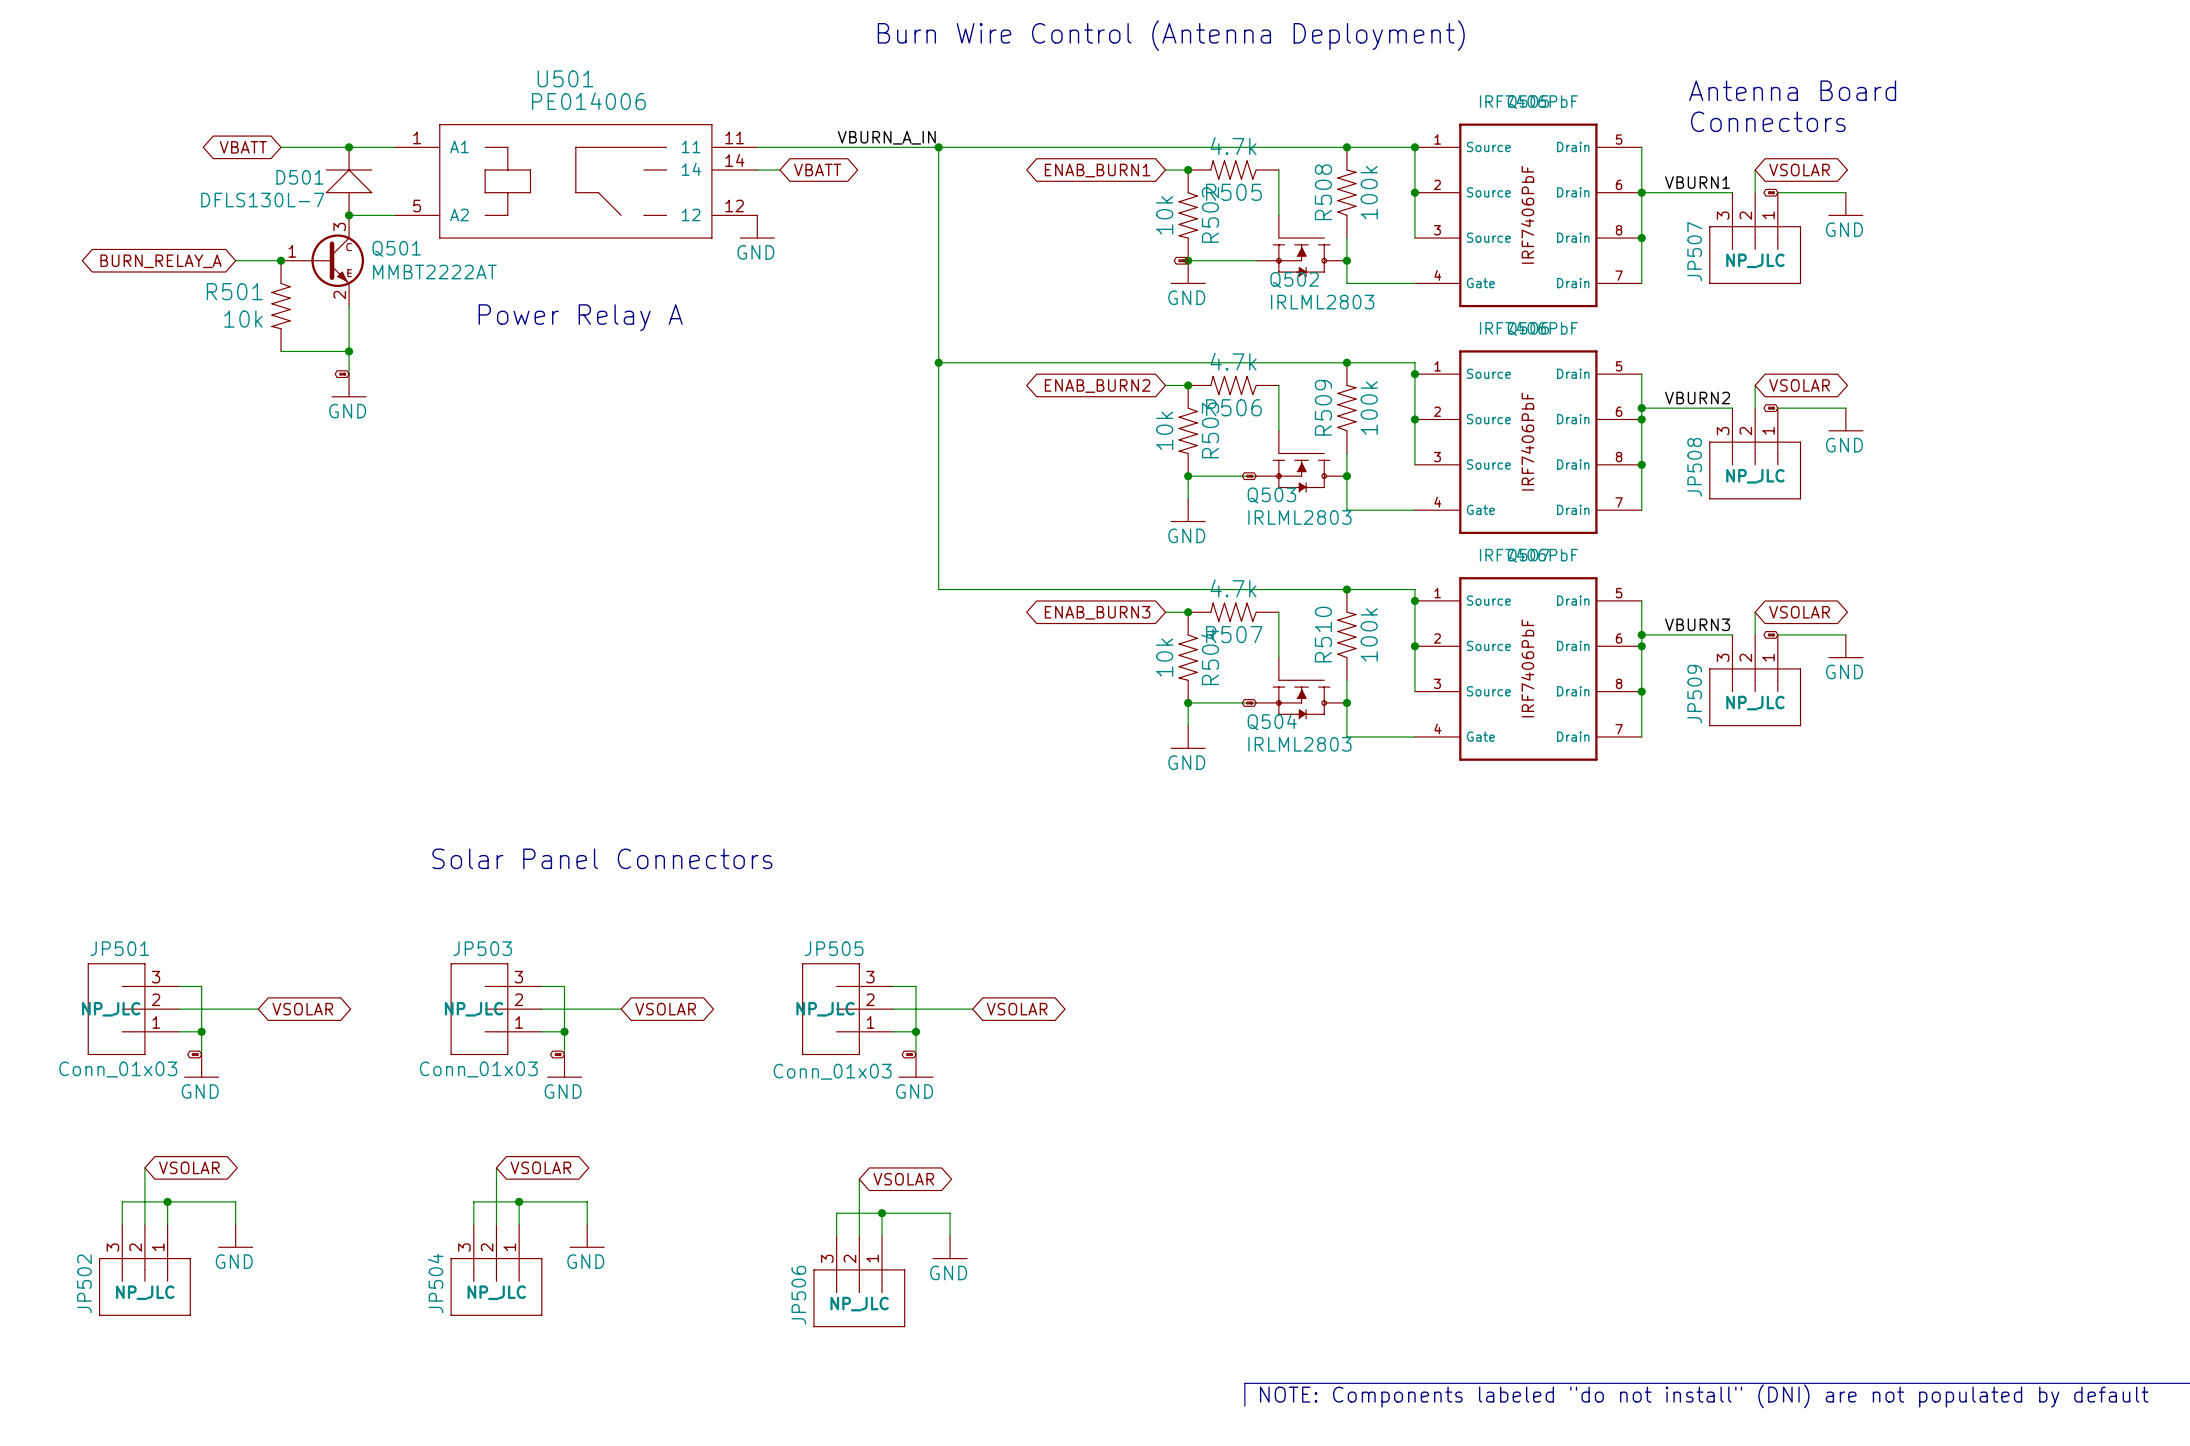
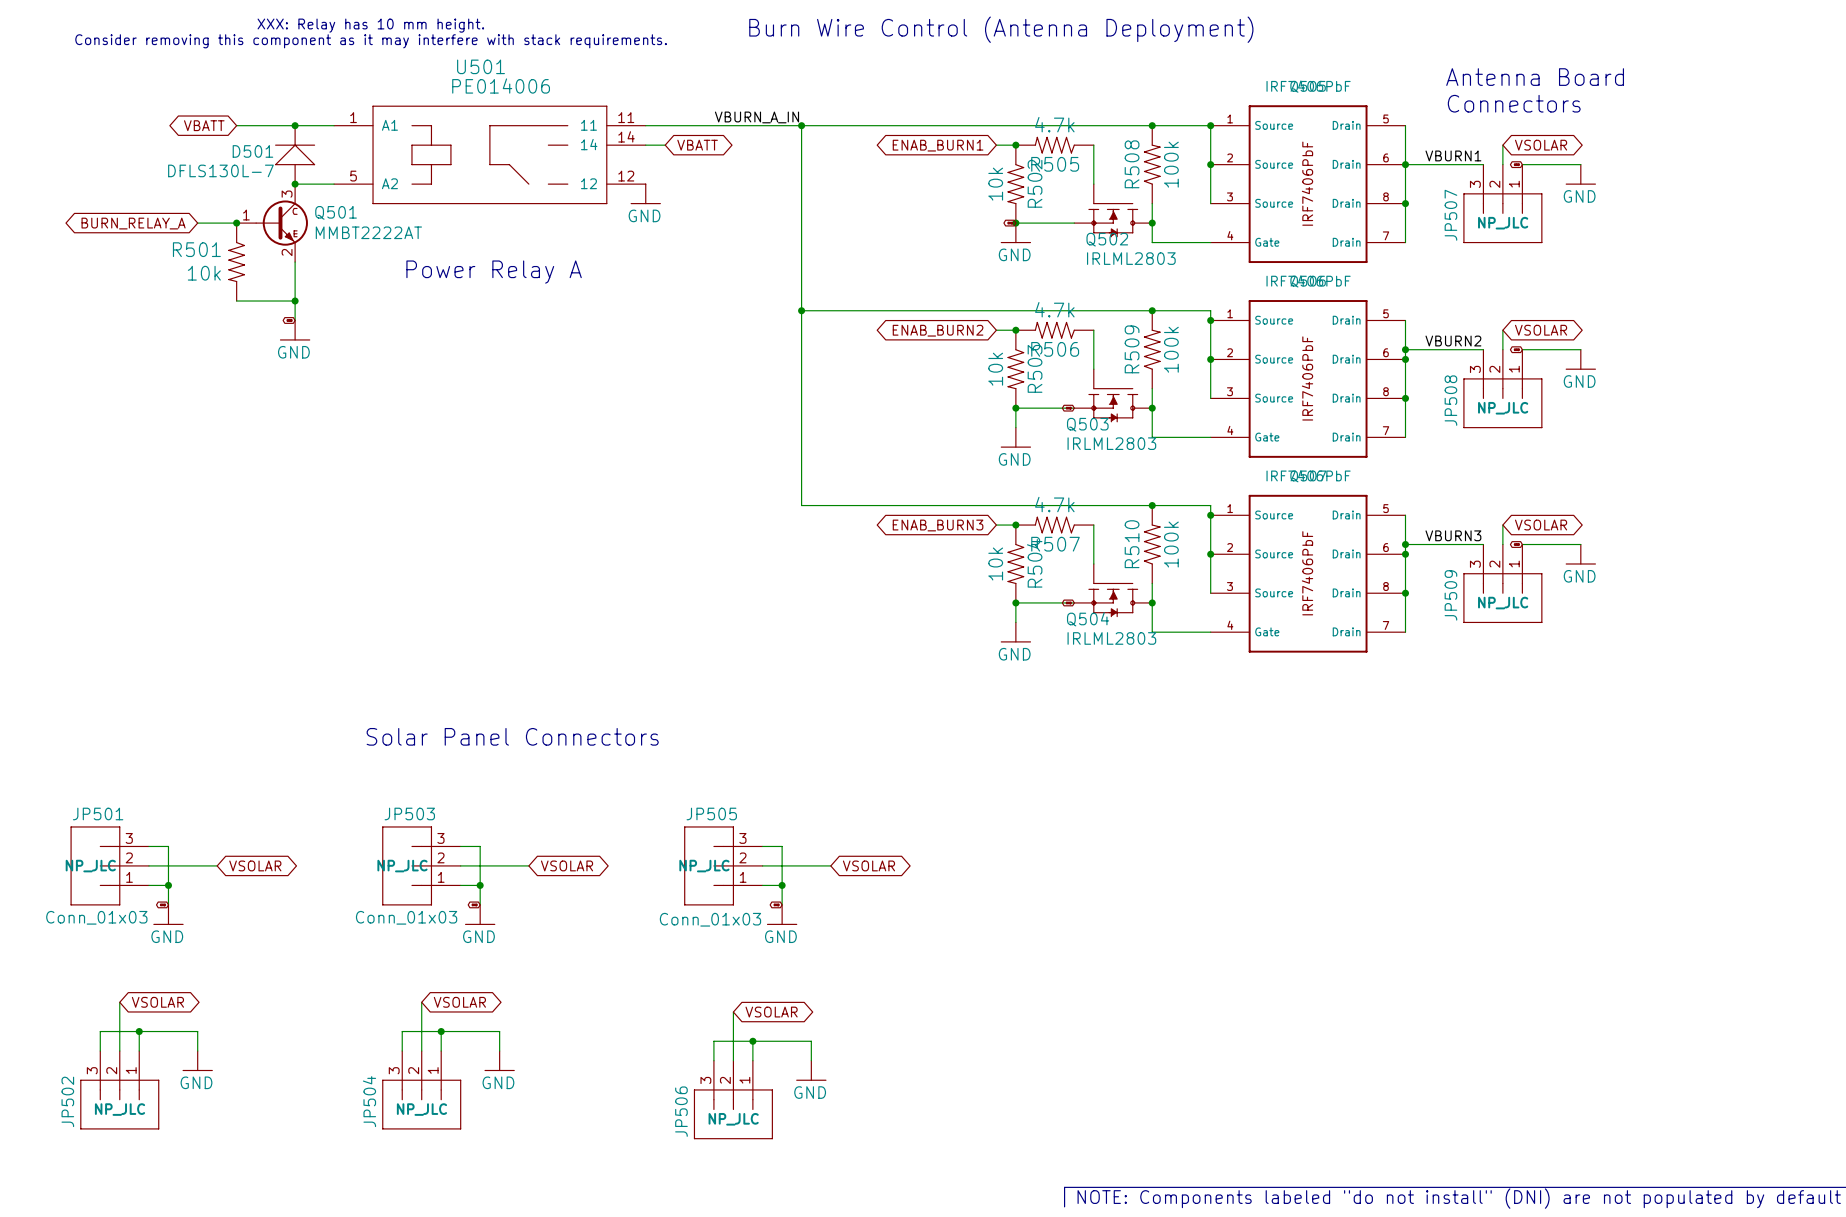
text: none -> XXX: Relay has 10 mm height. (370, 25)
text: none -> Consider removing this component as it may interfere with stack requirements. (371, 41)

